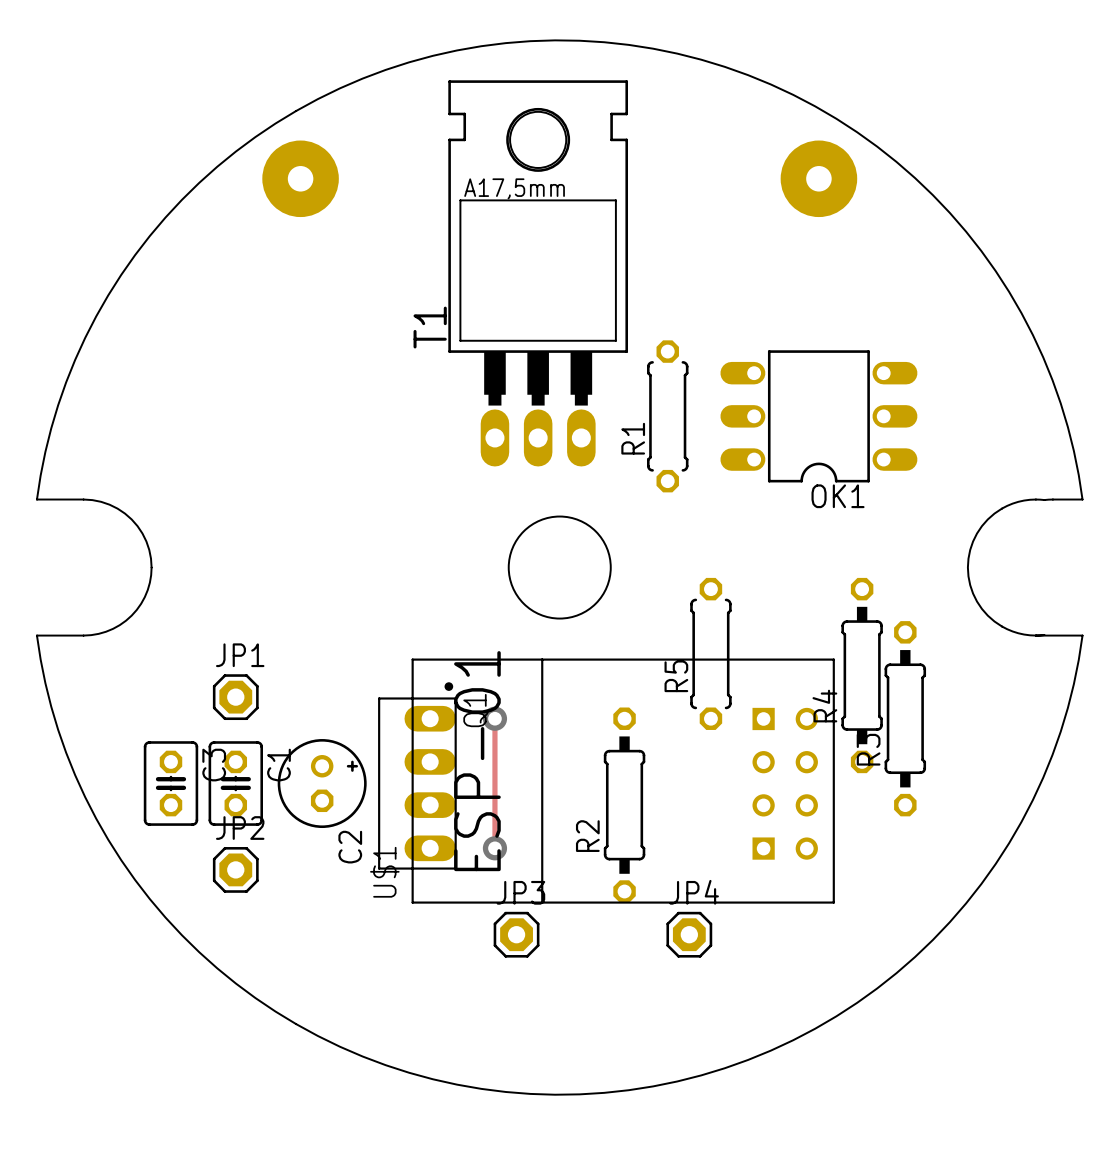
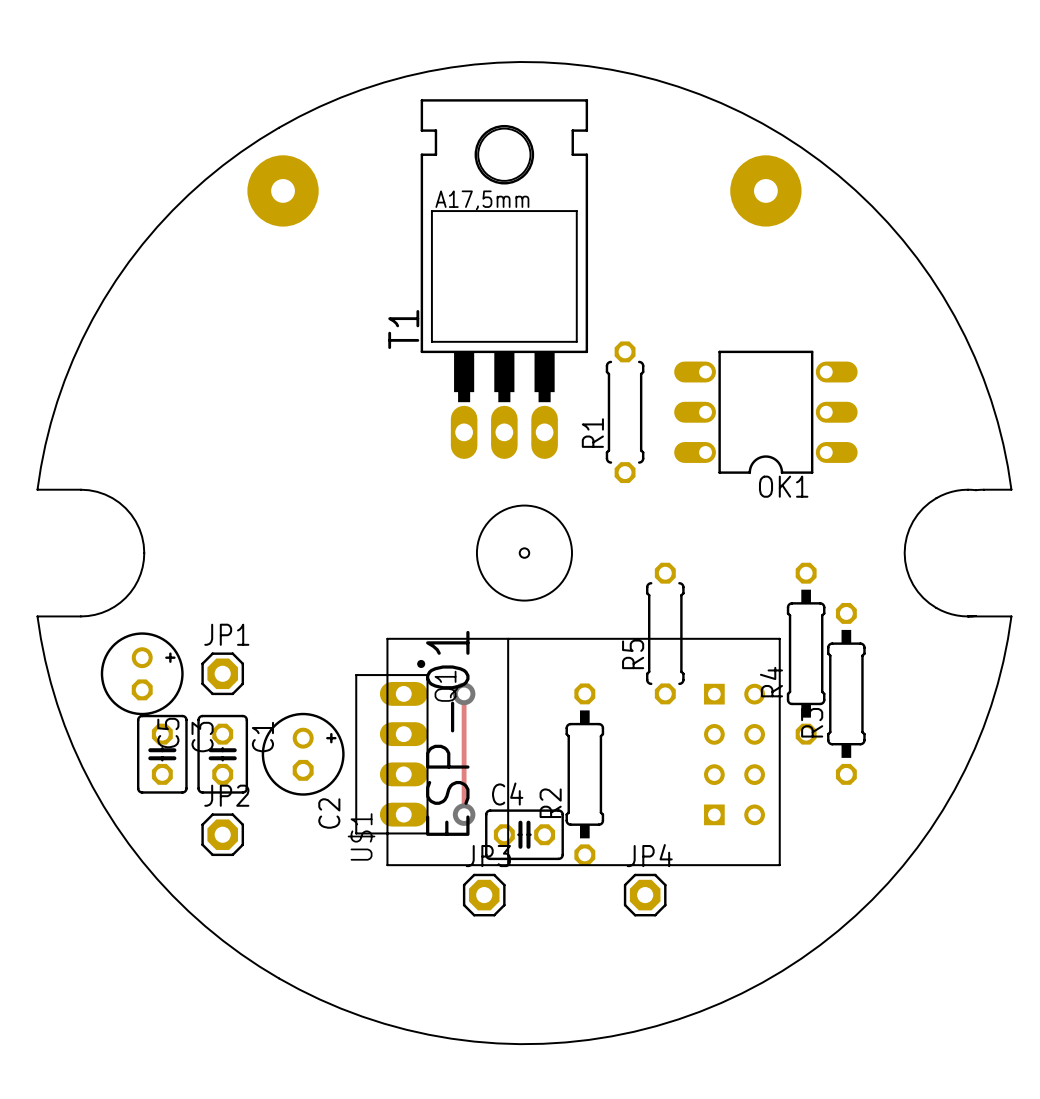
hole: none -> (524, 553)
C5: none -> (142, 673)
C4: none -> (524, 834)

